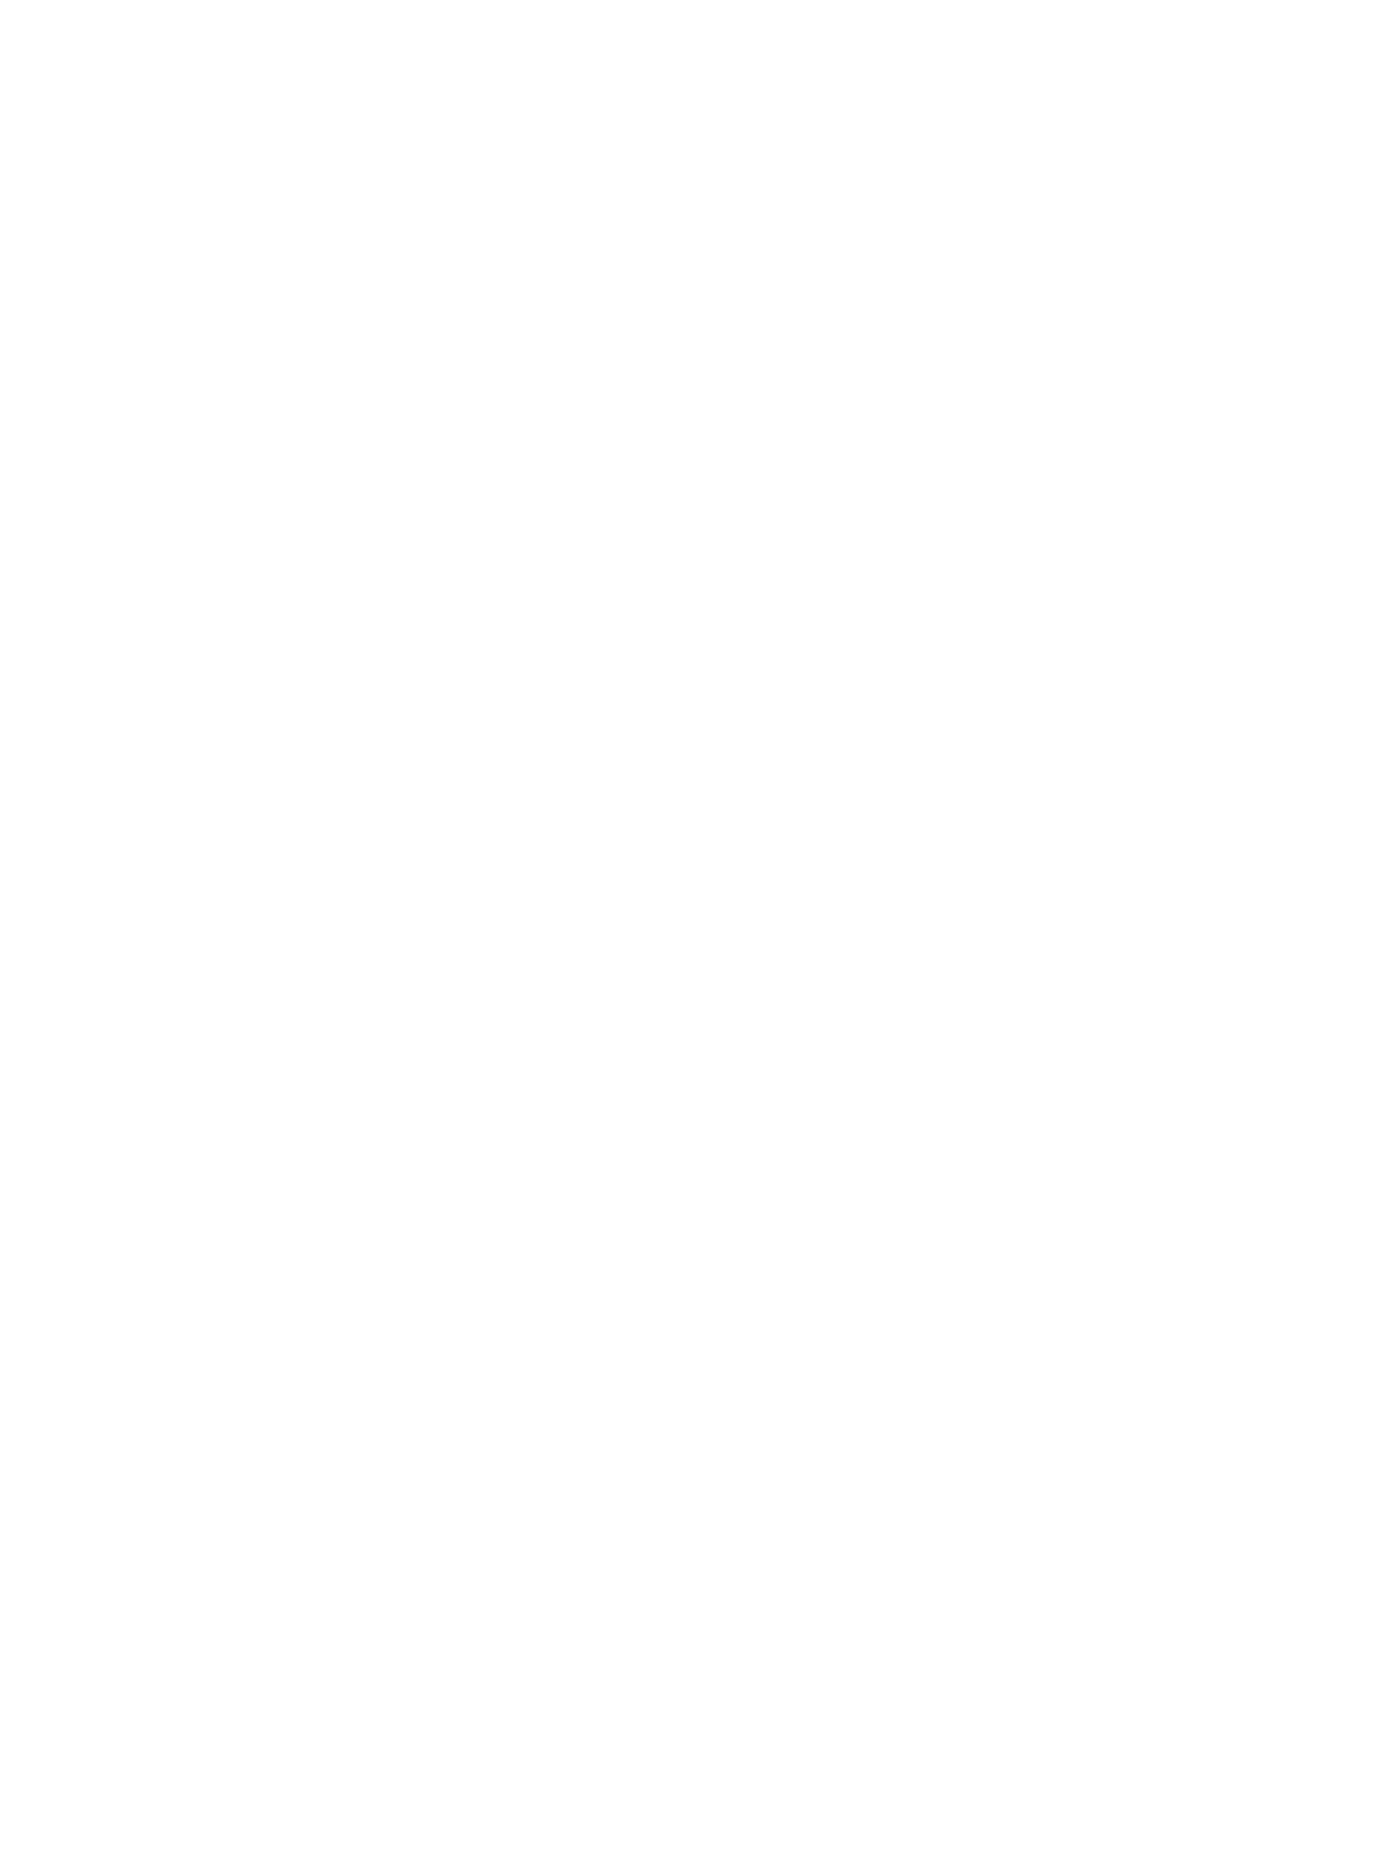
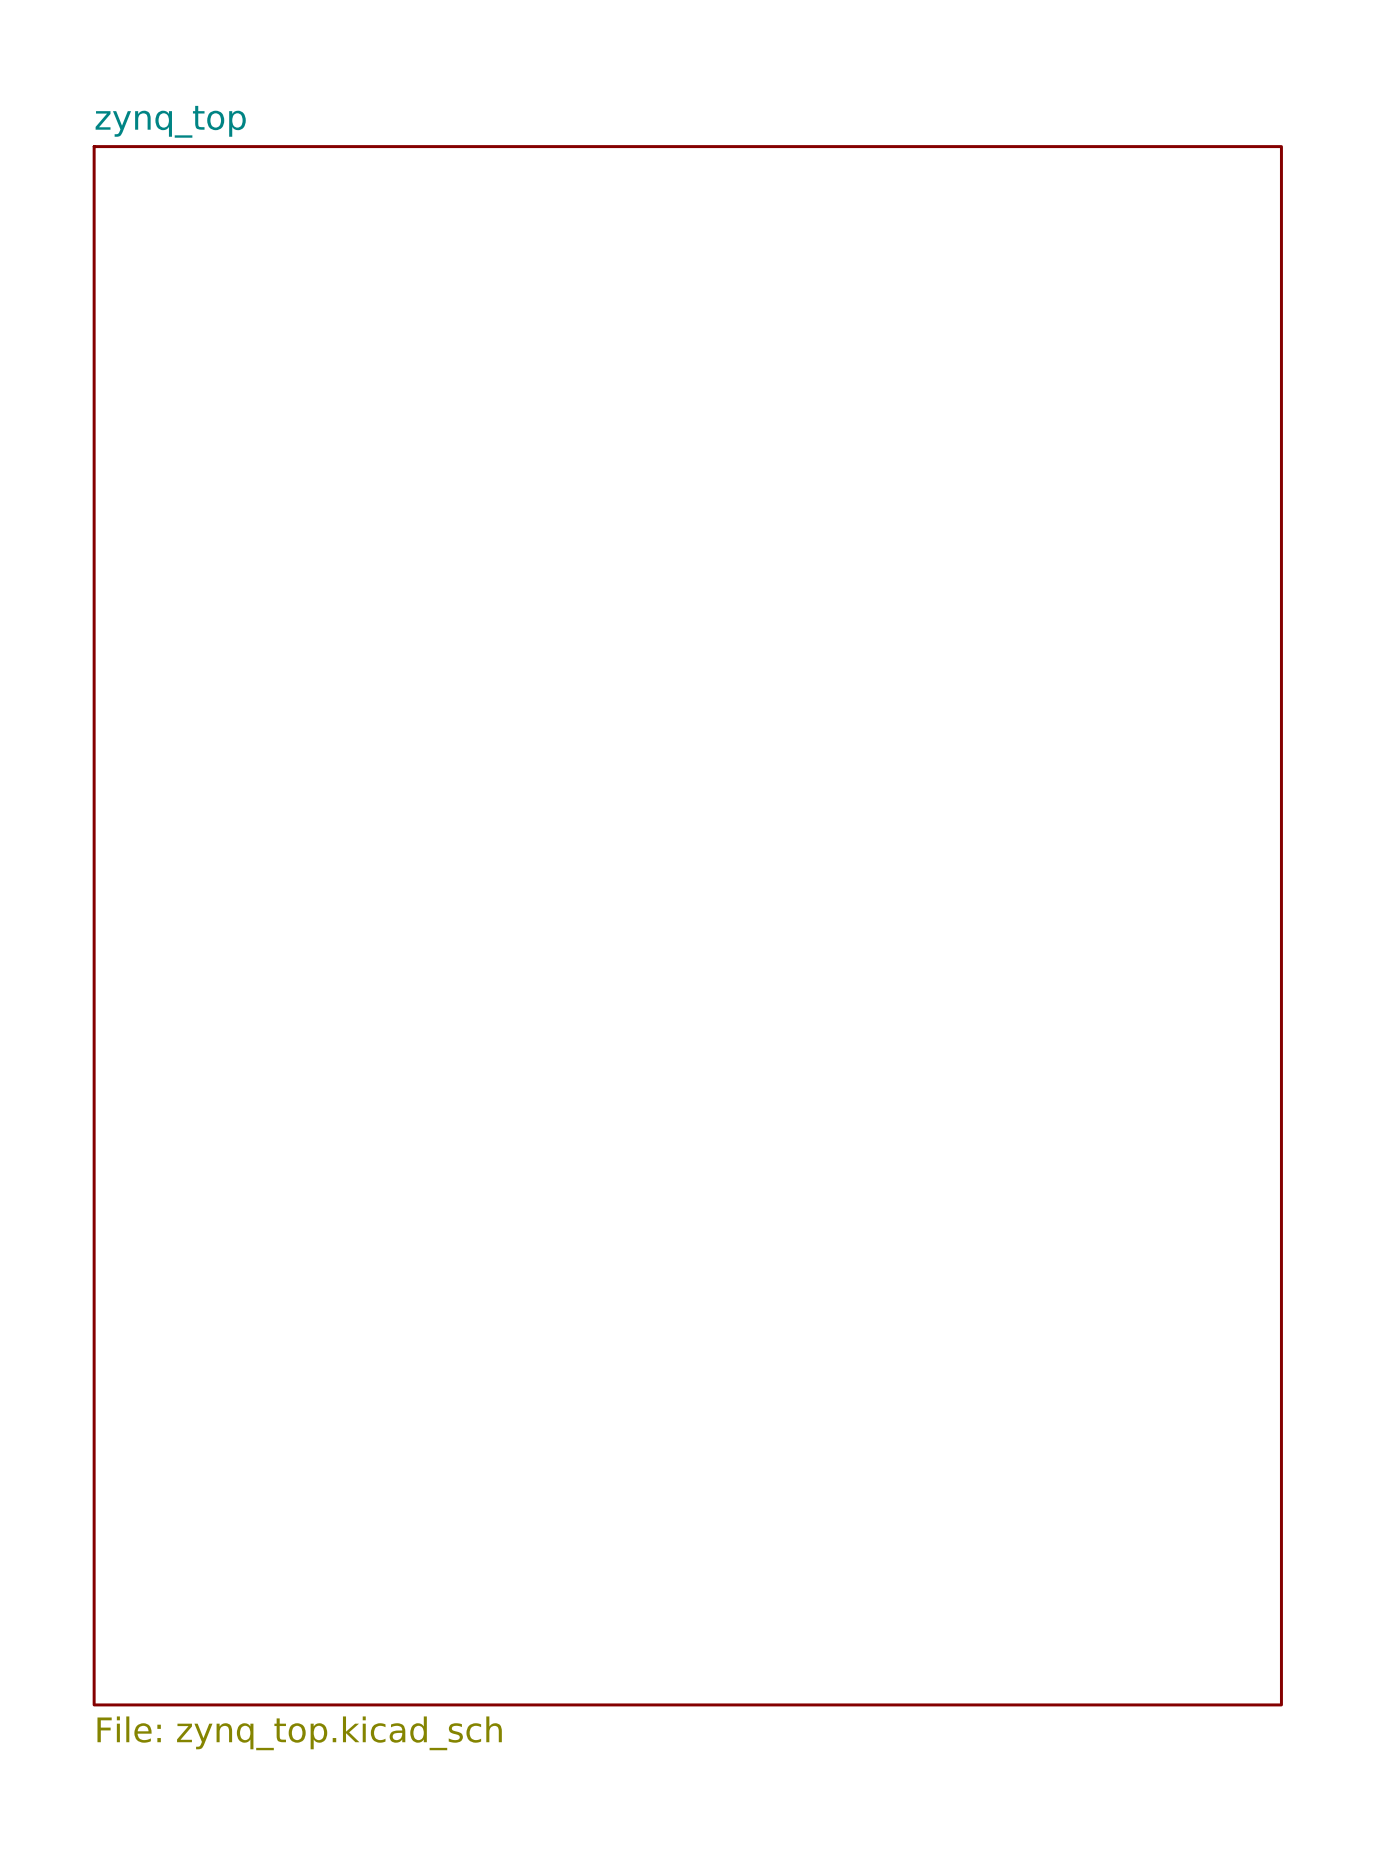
sheet zynq_top: none -> File: zynq_top.kicad_sch (687, 925)

